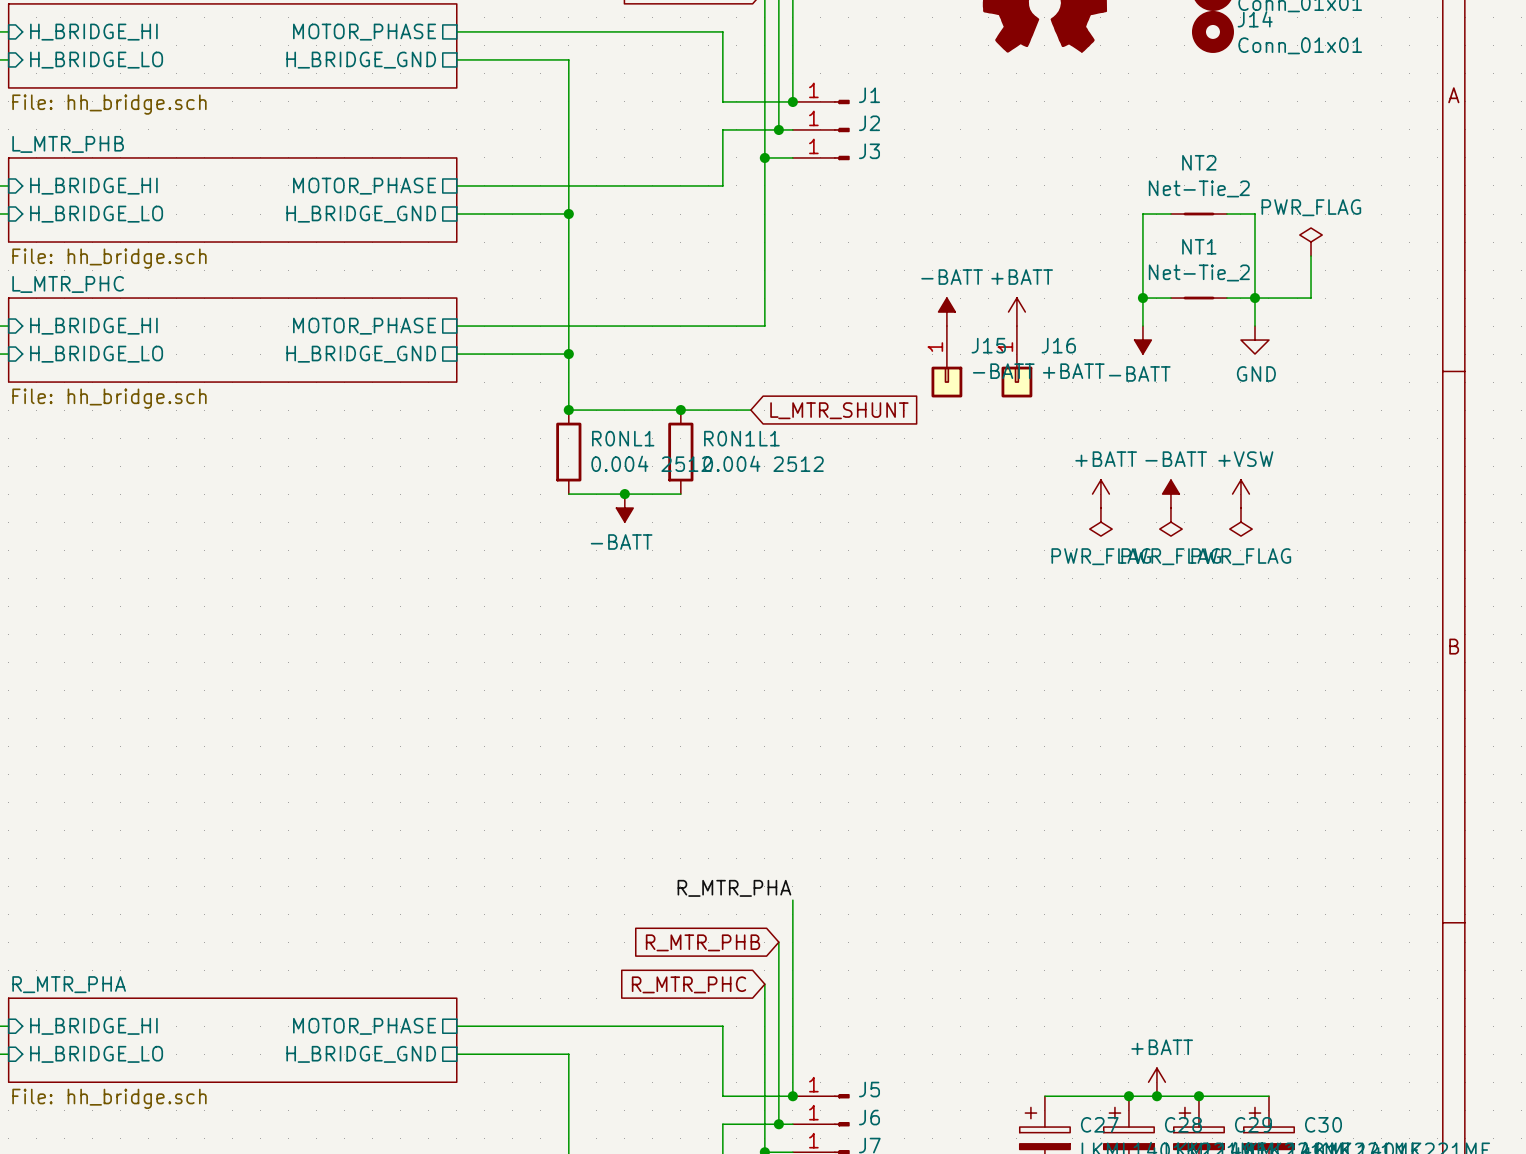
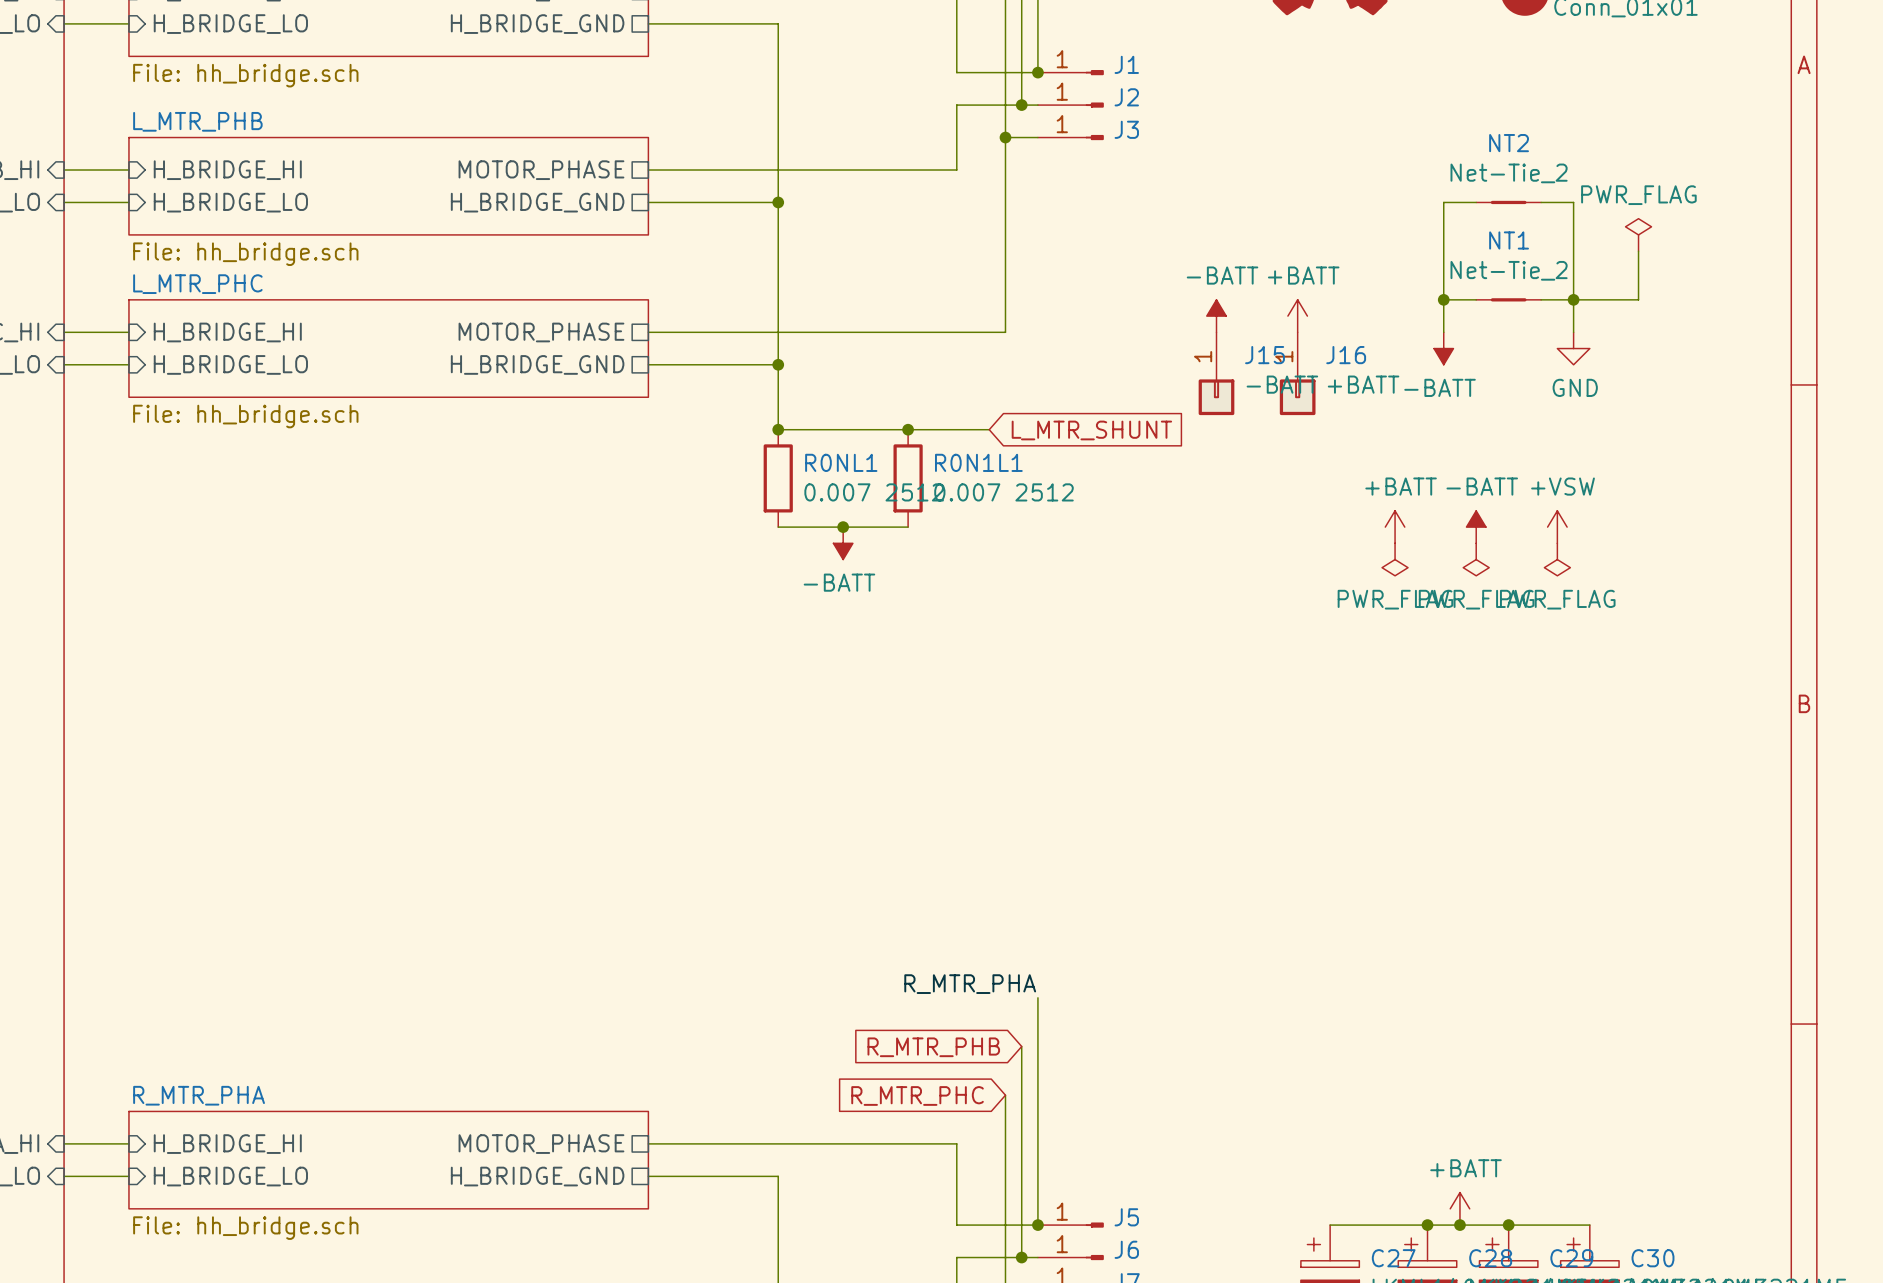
R0NL1 value: 0.004 2512 (651, 463) -> 0.007 2512 (874, 492)
R0N1L1 value: 0.004 2512 (763, 463) -> 0.007 2512 (1003, 492)

